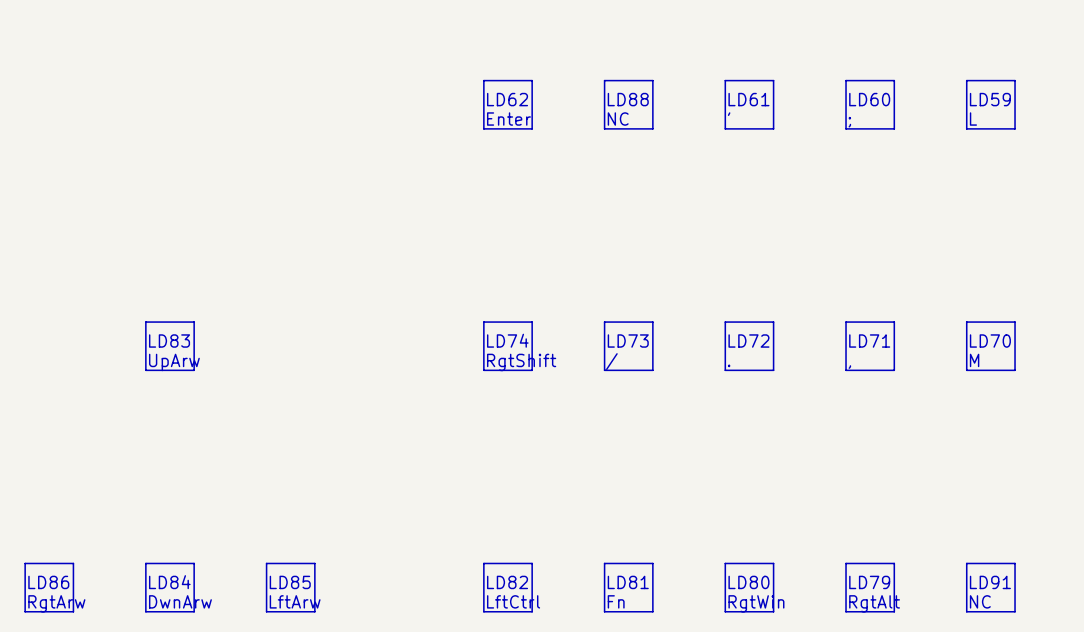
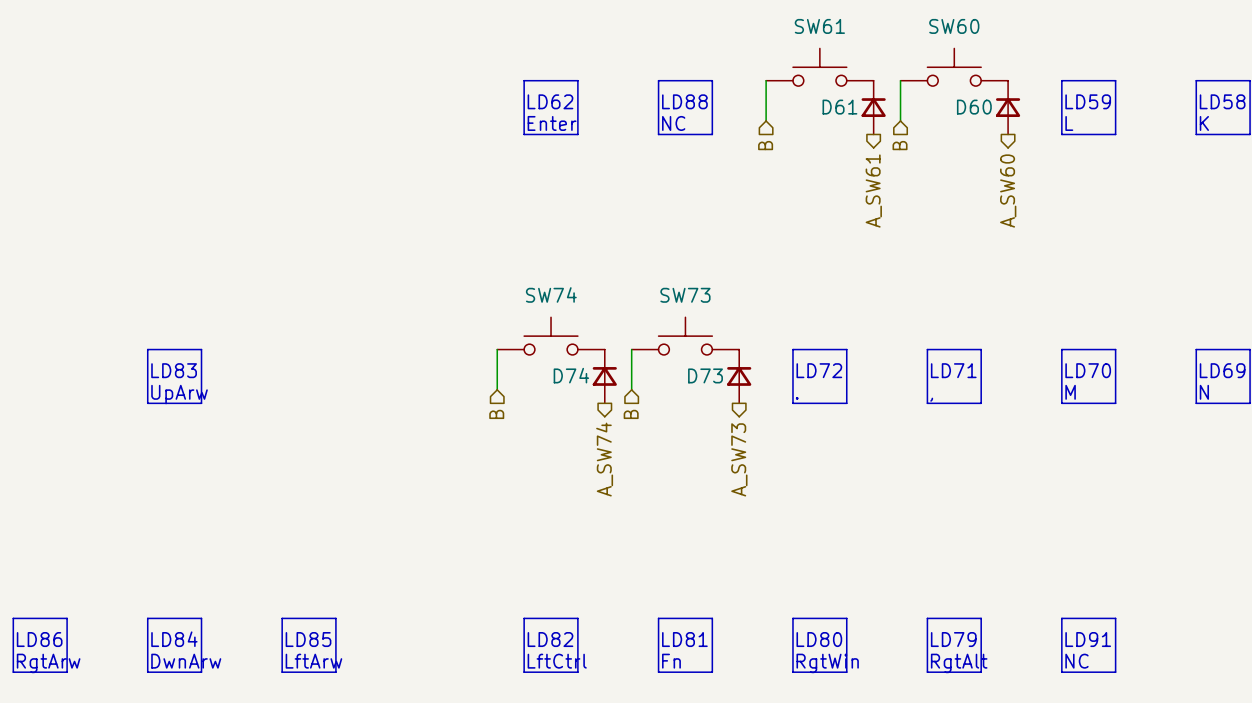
SW61: none -> (819, 67)
SW60: none -> (954, 67)
wire: none -> (766, 80) (766, 121)
line: (725, 80) (773, 80) (773, 128) (725, 128) (725, 80) -> none
wire: none -> (900, 80) (900, 121)
line: (846, 80) (894, 80) (894, 128) (846, 128) (846, 80) -> none
text: LD61 (748, 99) -> none
text: LD60 (869, 99) -> none
D61: none -> (873, 107)
D60: none -> (1008, 107)
text: ' (729, 114) -> none
text: ; (849, 122) -> none
hierarchical label: none -> B (765, 145)
hierarchical label: none -> B (900, 145)
hierarchical label: none -> A_SW61 (873, 191)
hierarchical label: none -> A_SW60 (1008, 191)
SW74: none -> (551, 336)
SW73: none -> (685, 336)
wire: none -> (497, 349) (497, 389)
line: (483, 322) (532, 322) (532, 370) (483, 370) (483, 322) -> none
wire: none -> (631, 349) (631, 389)
line: (604, 322) (652, 322) (652, 370) (604, 370) (604, 322) -> none
text: LD74 (507, 340) -> none
text: LD73 (628, 341) -> none
D74: none -> (604, 376)
D73: none -> (739, 376)
text: / (611, 361) -> none
text: RgtShift (521, 362) -> none
hierarchical label: none -> B (496, 414)
hierarchical label: none -> B (631, 414)
hierarchical label: none -> A_SW74 (604, 459)
hierarchical label: none -> A_SW73 (739, 459)

